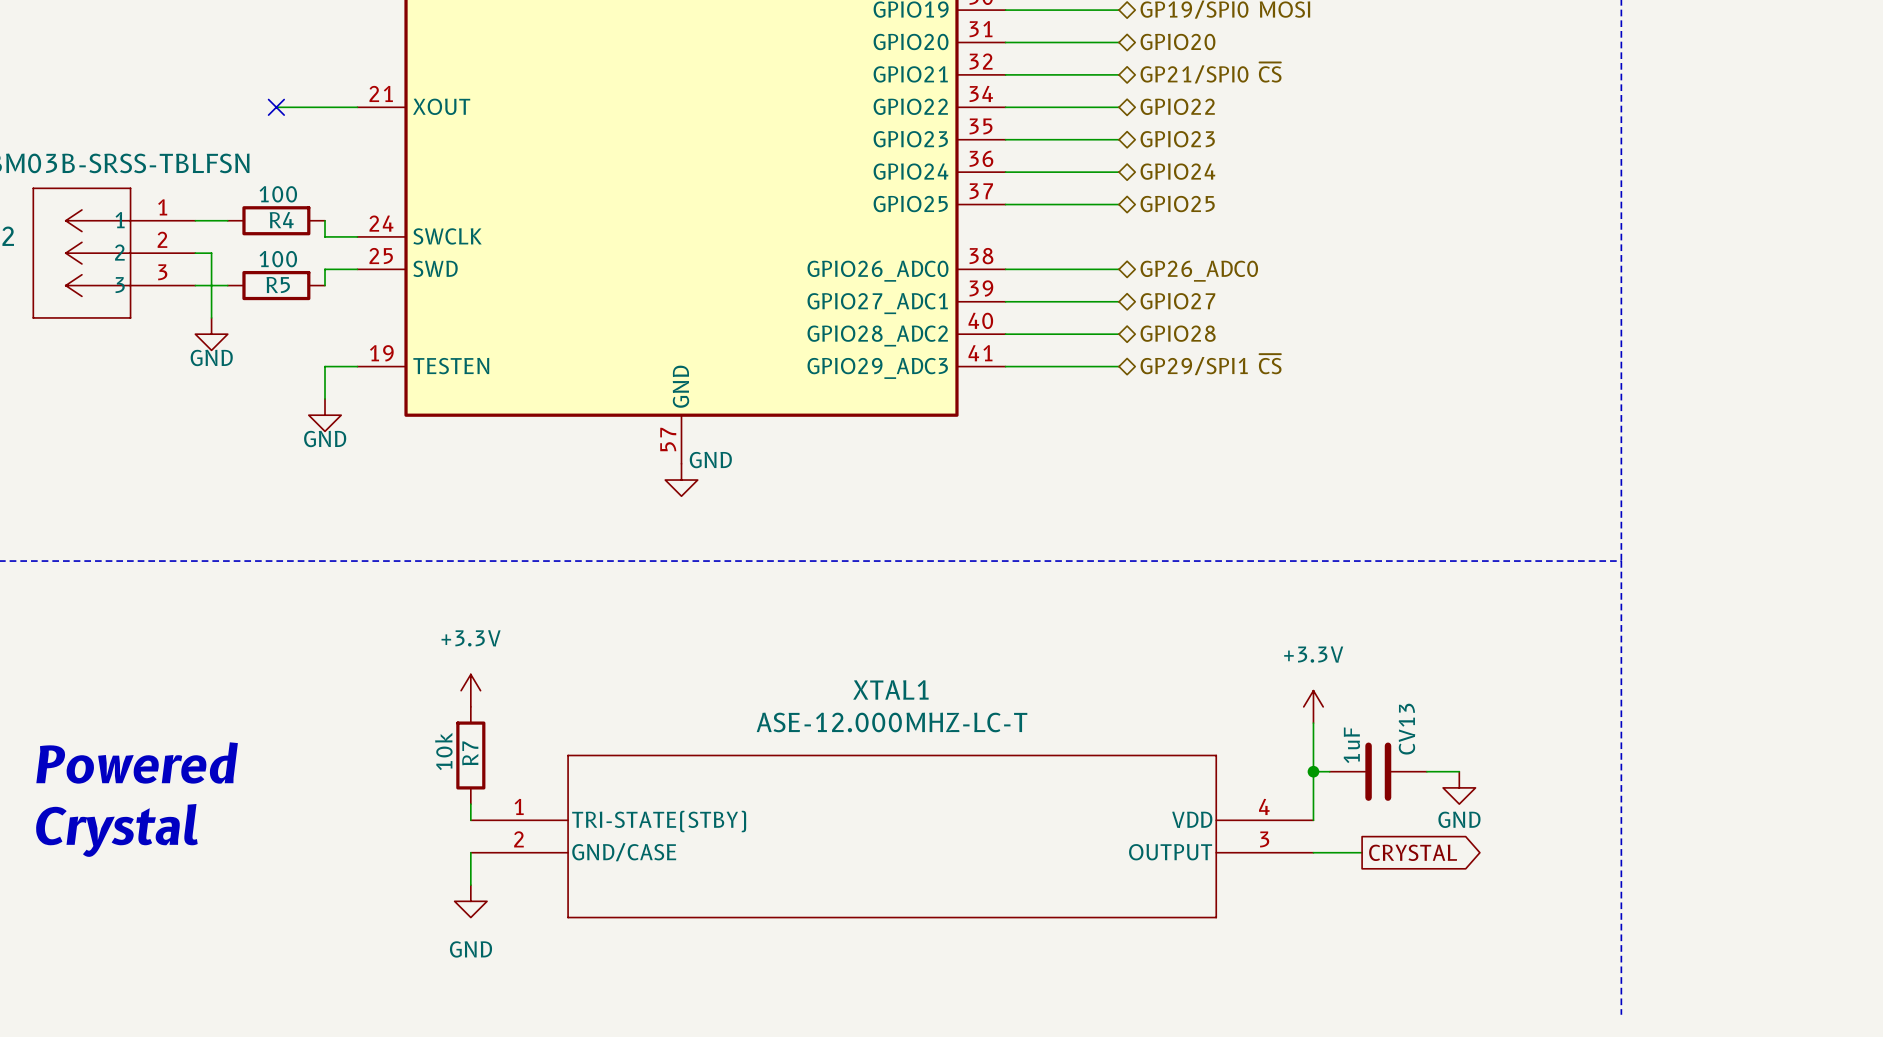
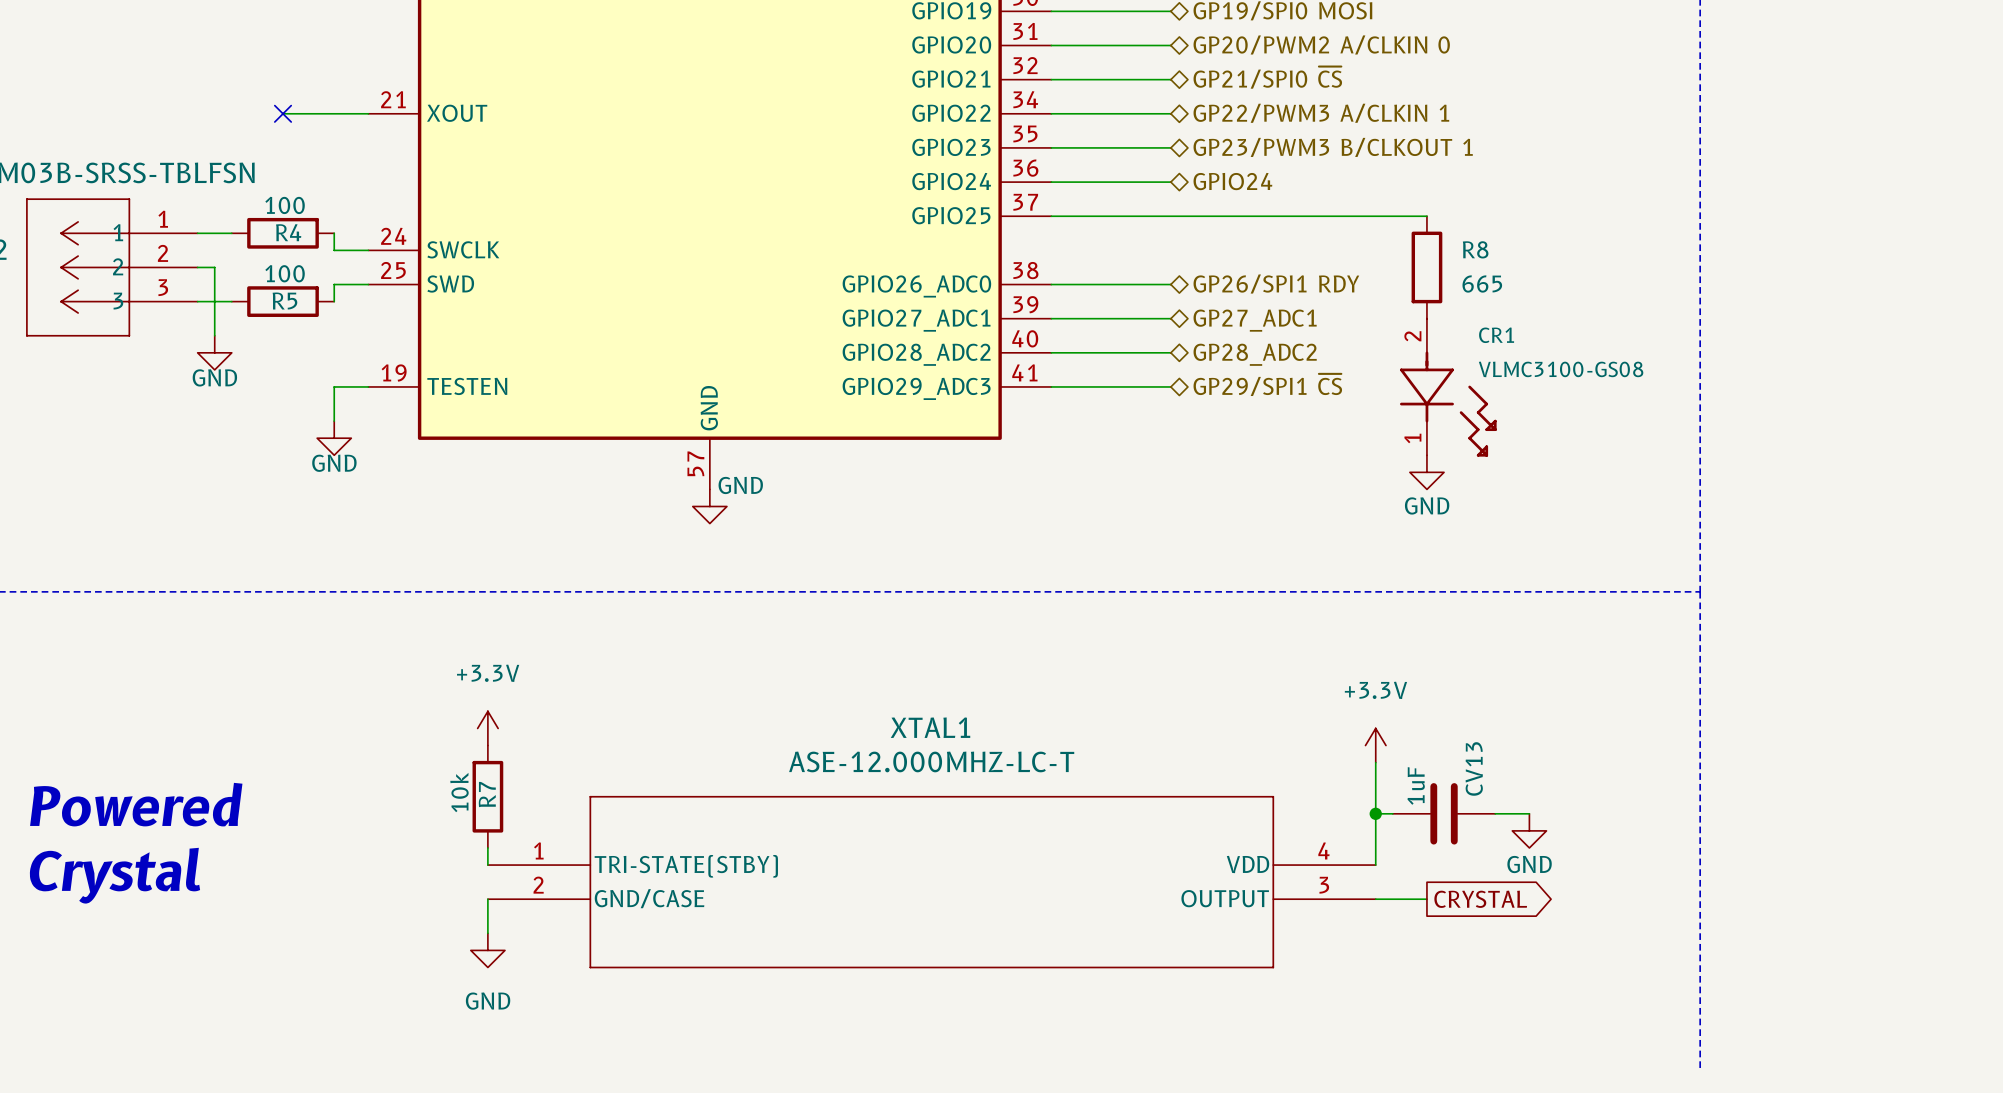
hierarchical label: GPIO20 (1177, 41) -> GP20/PWM2 A/CLKIN 0 (1321, 44)
hierarchical label: GPIO22 (1177, 106) -> GP22/PWM3 A/CLKIN 1 (1321, 113)
hierarchical label: GPIO23 (1177, 139) -> GP23/PWM3 B/CLKOUT 1 (1333, 147)
wire: none -> (1170, 216) (1426, 216)
hierarchical label: GPIO25 (1177, 204) -> none
R8: none -> 665 (1426, 267)
hierarchical label: GP26_ADC0 (1199, 271) -> GP26/SPI1 RDY (1276, 284)
hierarchical label: GPIO27 (1177, 301) -> GP27_ADC1 (1255, 320)
hierarchical label: GPIO28 (1178, 333) -> GP28_ADC2 (1255, 354)
CR1: none -> VLMC3100-GS08 (1448, 387)
power symbol: none -> GND (1426, 472)

